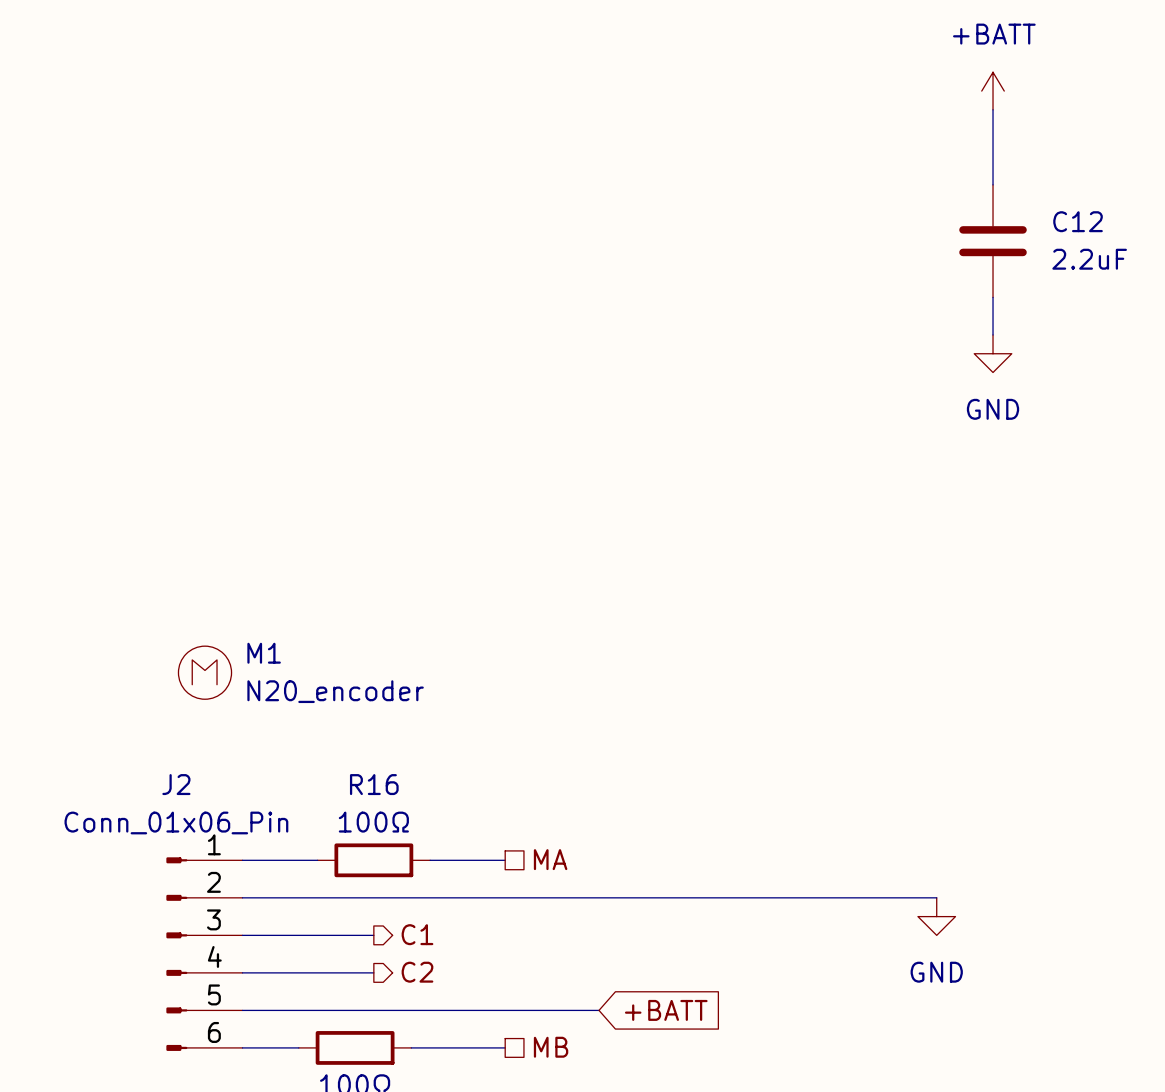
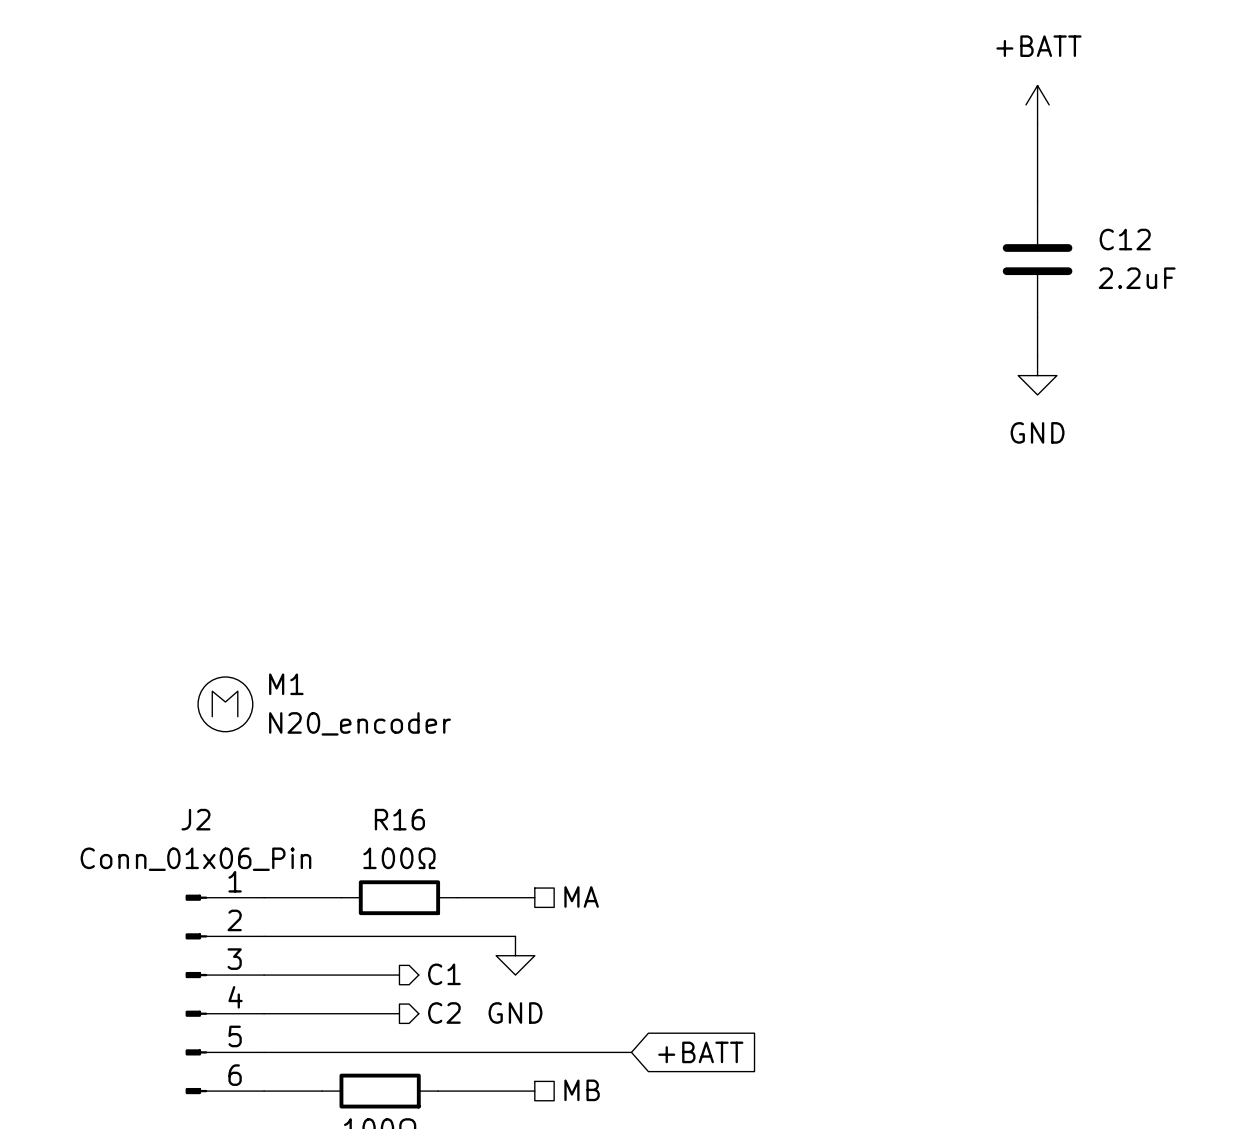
wire: (486, 897) (936, 897) -> none
power symbol: none -> GND (515, 955)
power symbol: GND (936, 916) -> none

